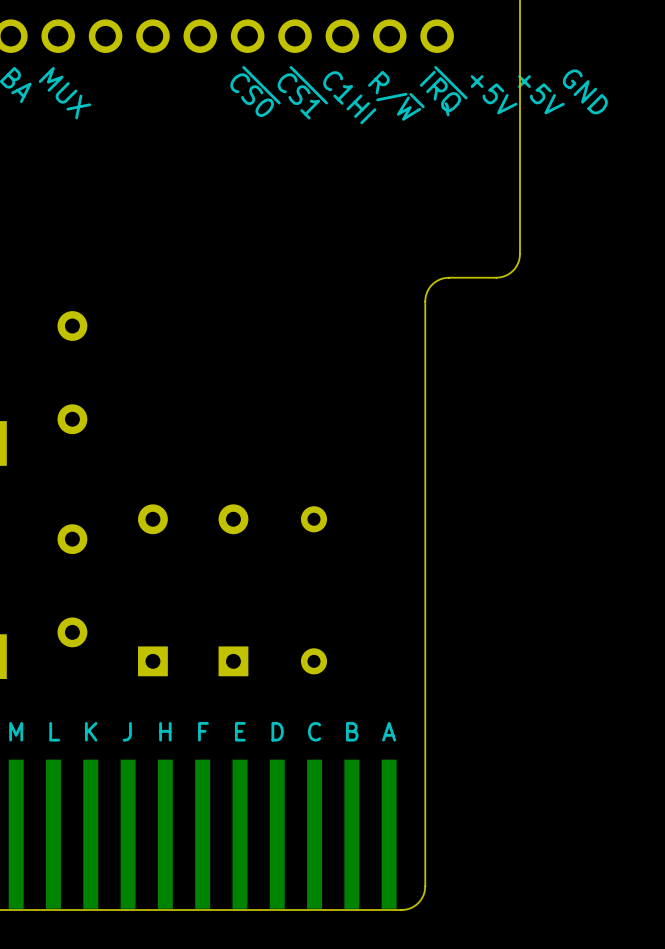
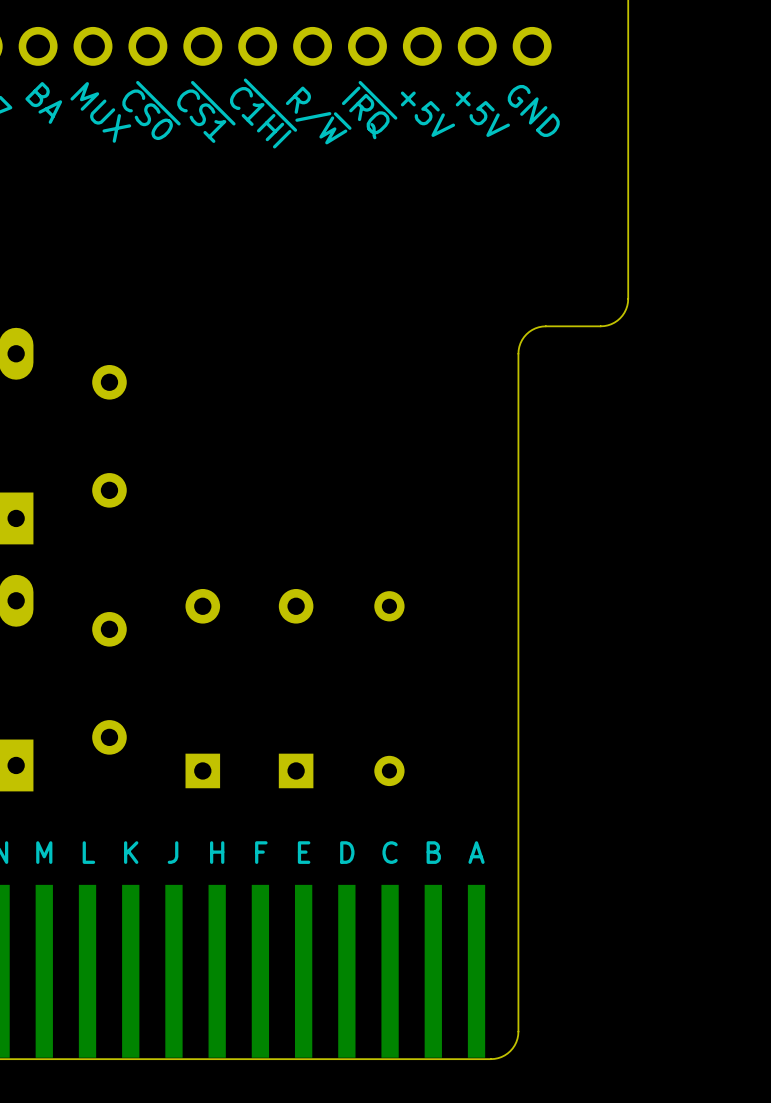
text: none -> ~{CS0} (151, 110)
text: ~{CS0} (255, 91) -> R/~{W} (318, 115)
text: ~{IRQ} (443, 91) -> GND (533, 110)
text: GND (585, 91) -> none
text: none -> ~{CS1} (206, 111)
text: ~{CS1} (302, 92) -> ~{IRQ} (369, 110)
text: none -> ~{C1HI} (263, 113)
text: +5V (494, 94) -> none
text: +5V (541, 94) -> none
text: R/~{W} (396, 95) -> +5V (482, 114)
text: C1HI (349, 97) -> +5V (427, 114)

